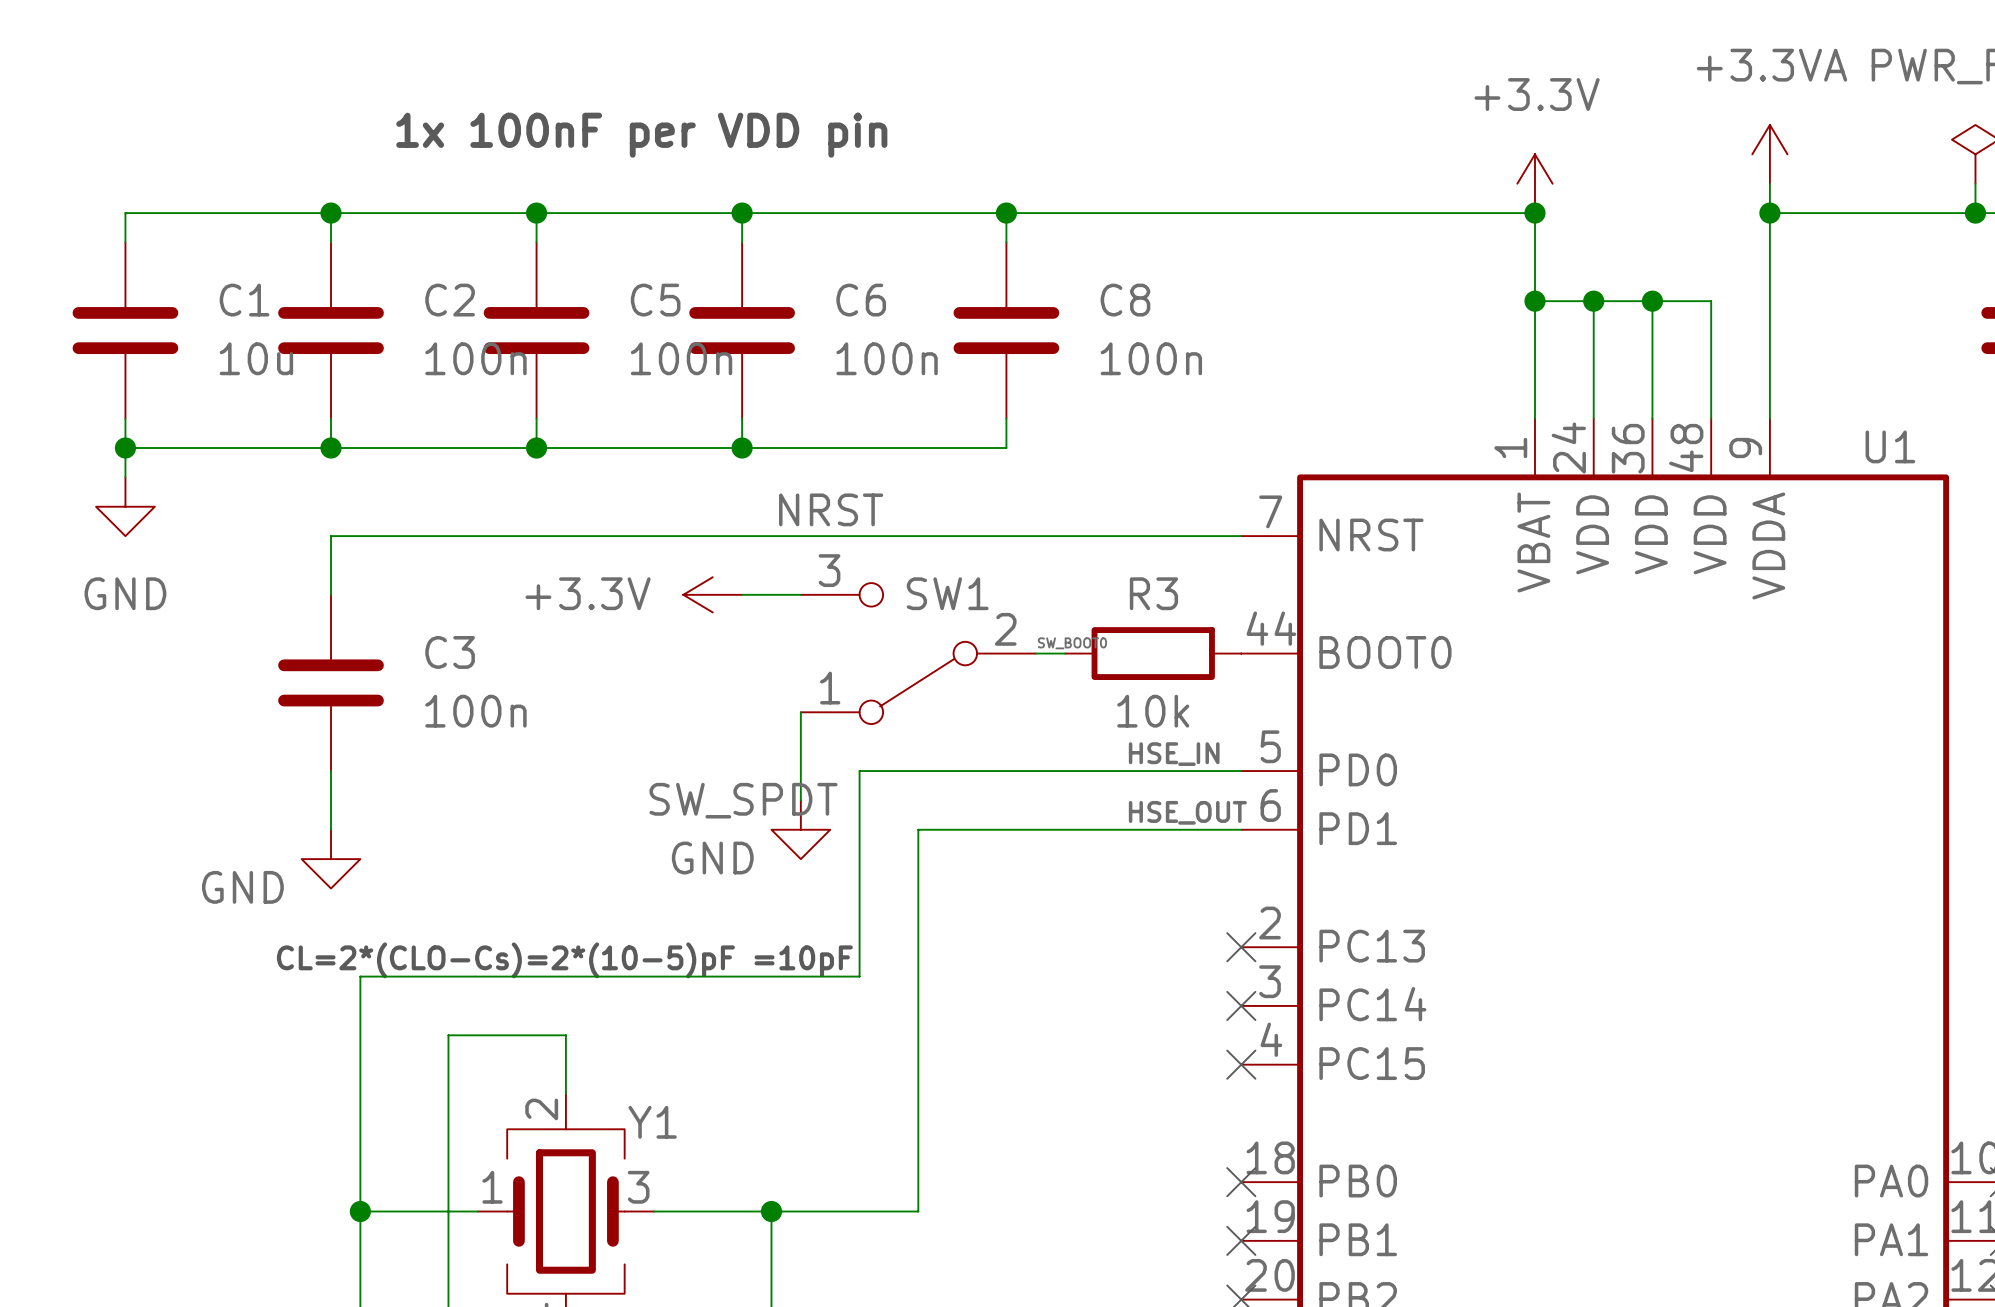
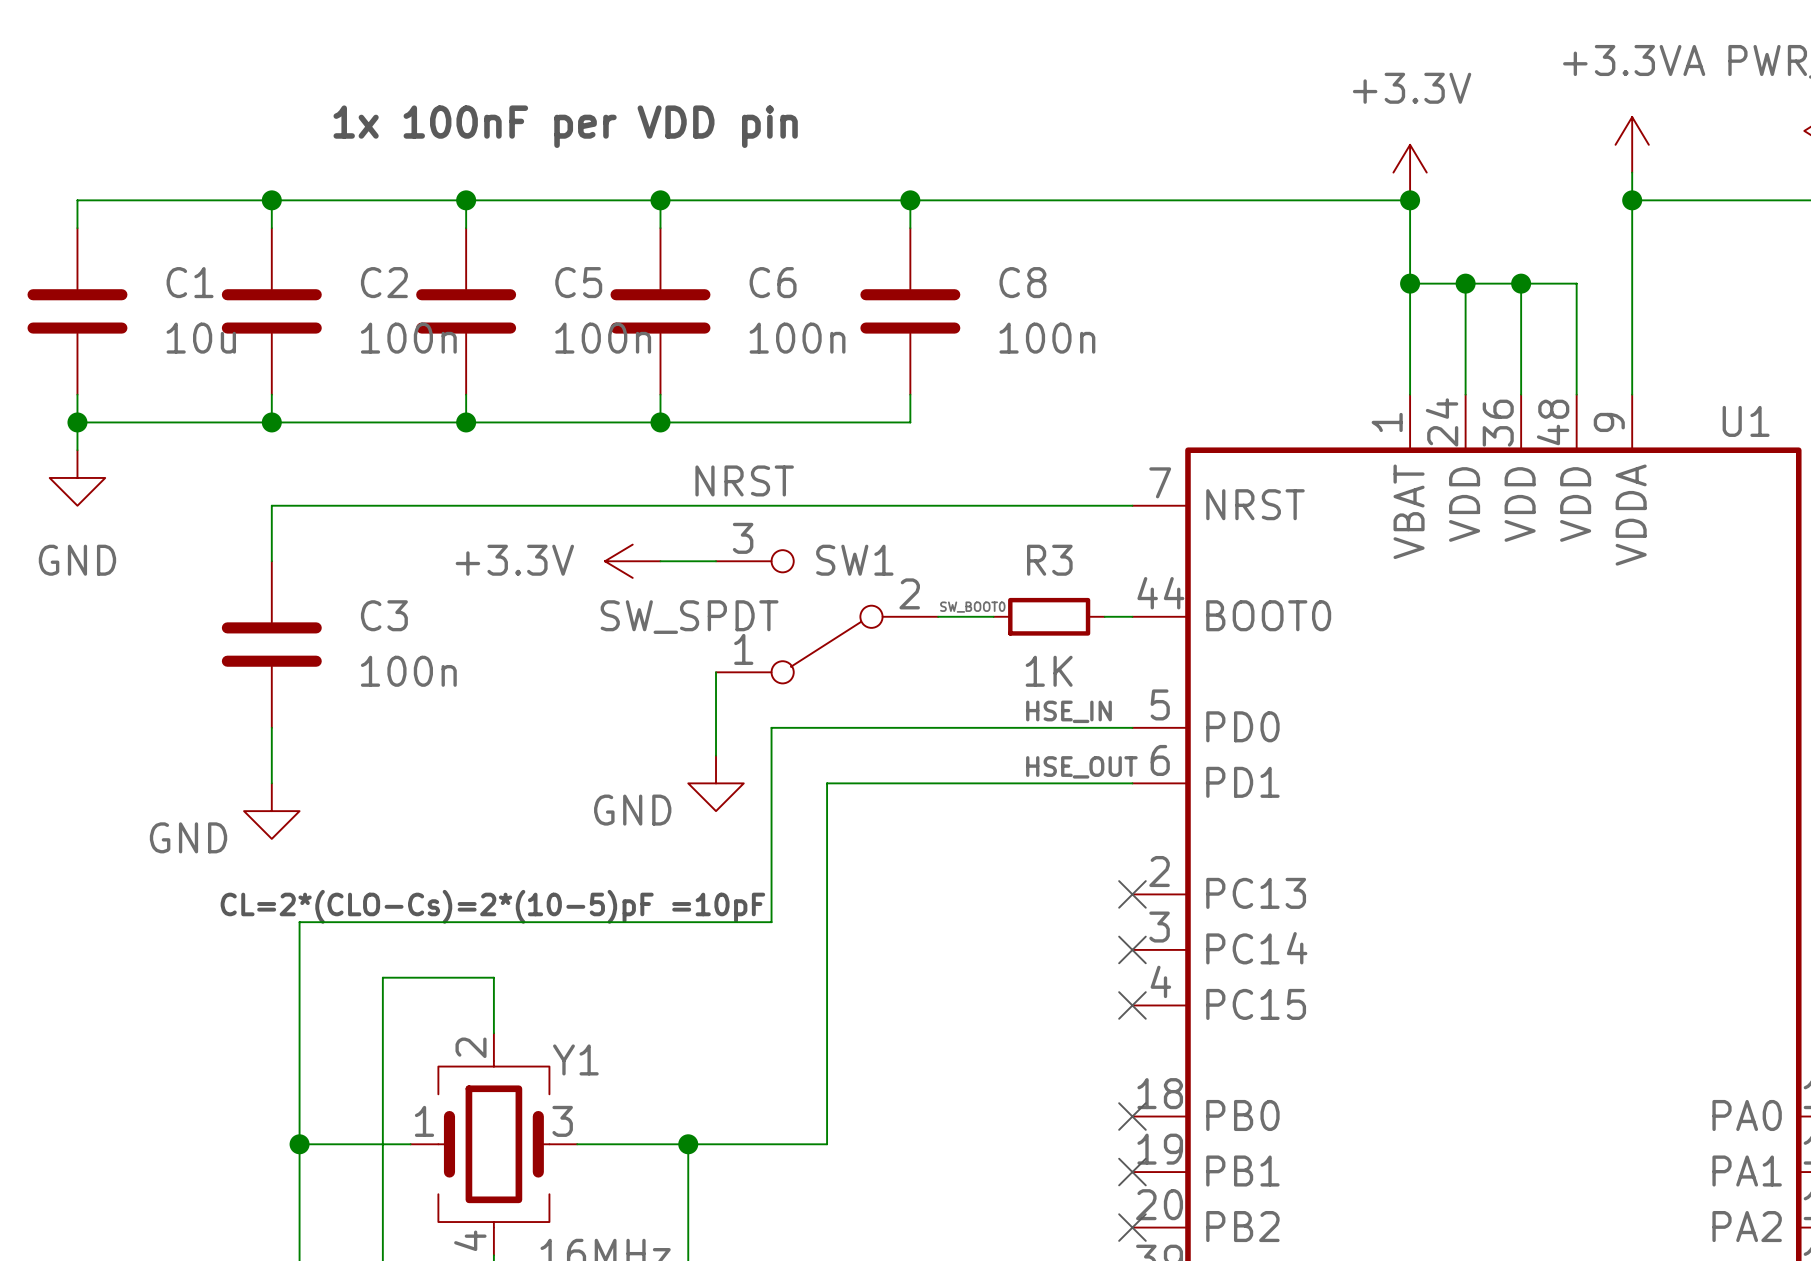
R3 symbol: [1065, 627, 1242, 680] -> [993, 597, 1105, 636]
R3 value: 10k (1153, 711) -> 1K (1049, 671)
SW1 value position: SW_SPDT (743, 800) -> SW_SPDT (689, 617)

